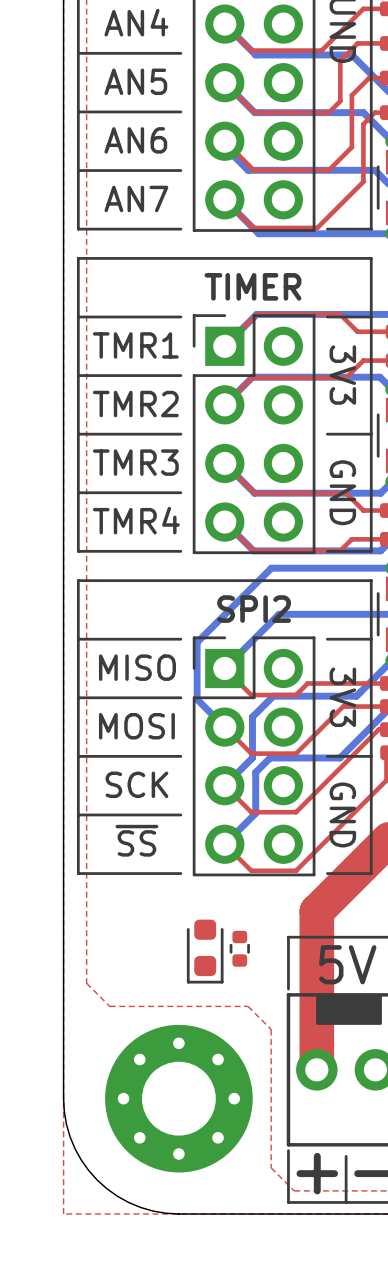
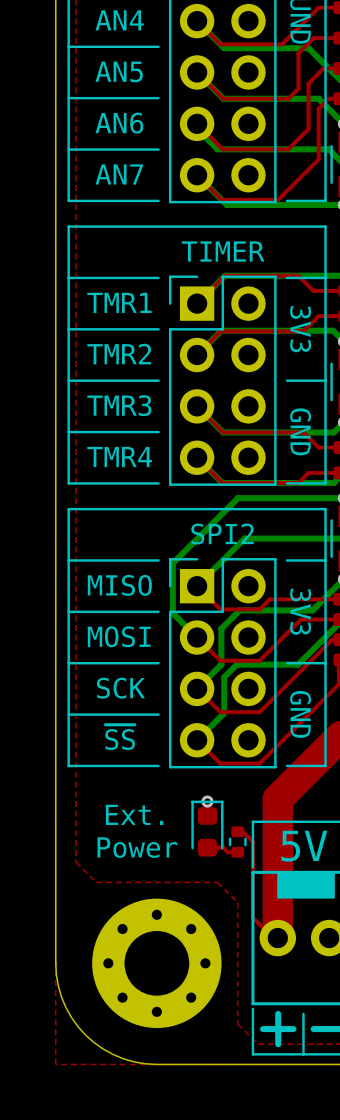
via: none -> (207, 801)
text: none -> Ext. (134, 814)
part footprint: [229, 930, 250, 967] -> [191, 800, 224, 857]
top track: none -> (237, 831) (242, 831) (252, 842) (252, 917) (273, 938) (277, 938)
part: (205, 951) -> none
part: none -> (237, 842)
text: none -> Power (137, 847)
top track: none -> (207, 847) (223, 847) (227, 852) (237, 852)

